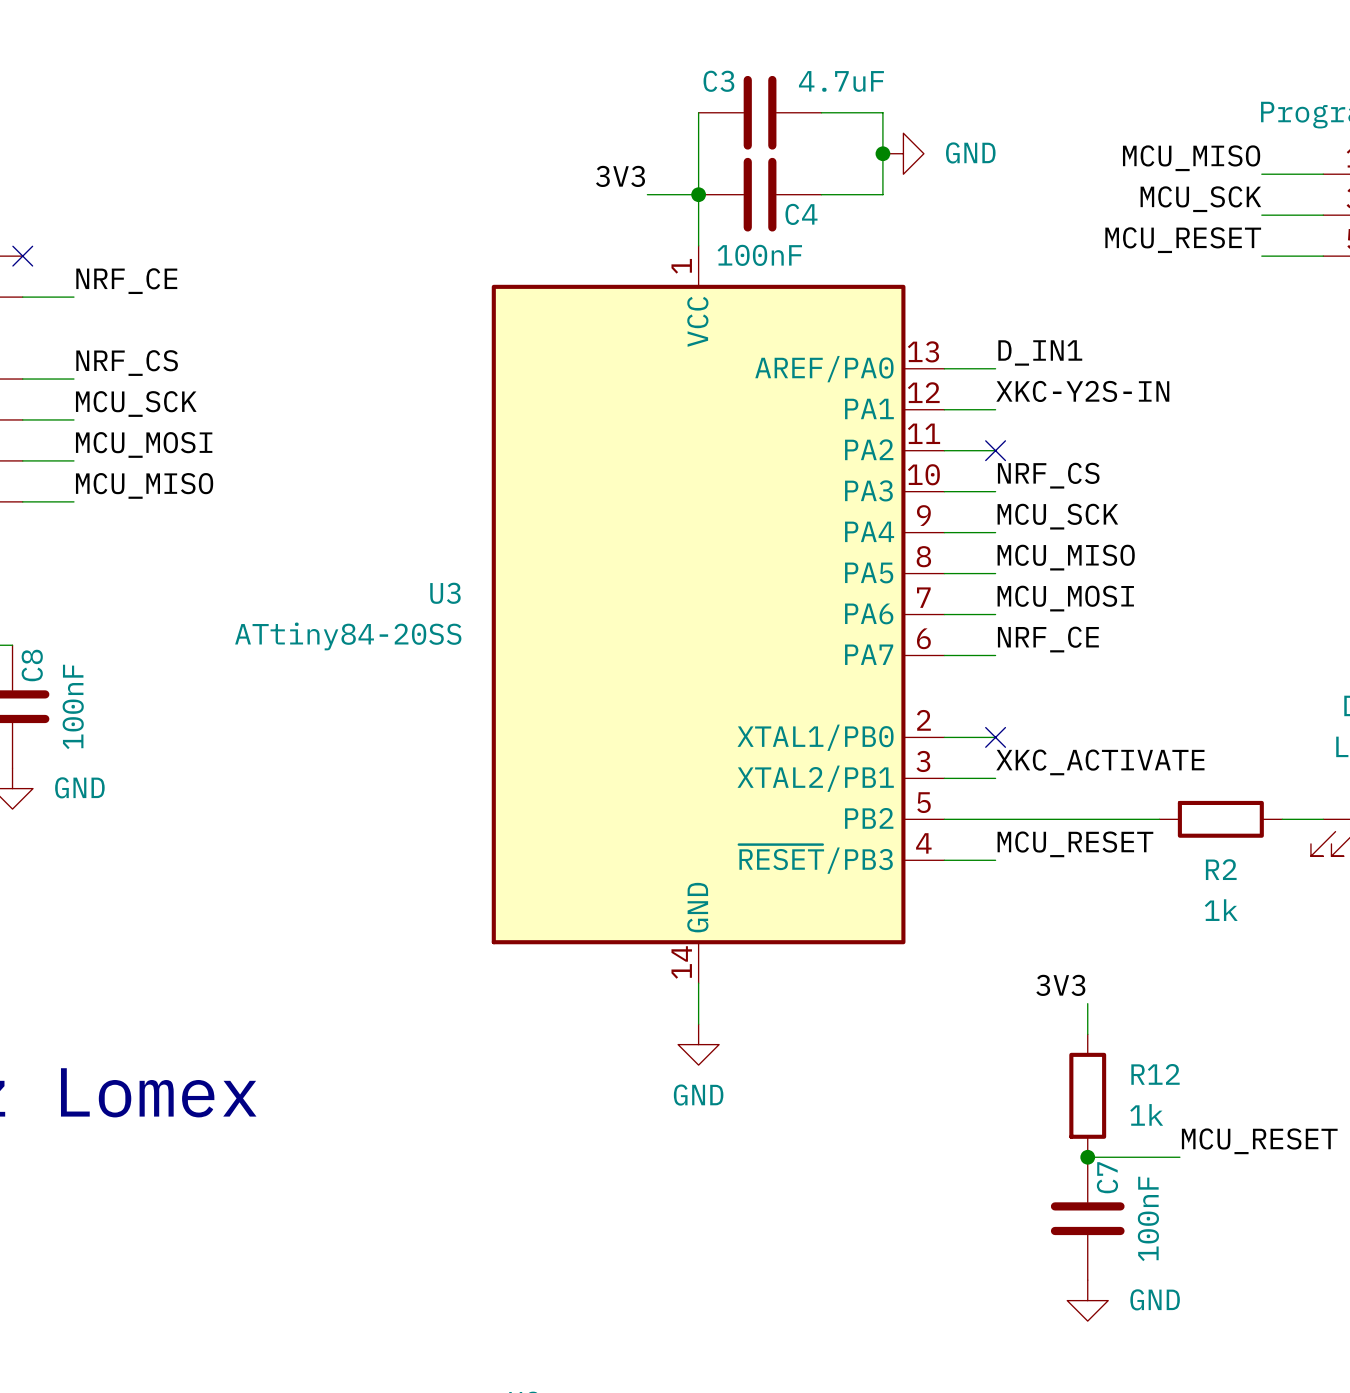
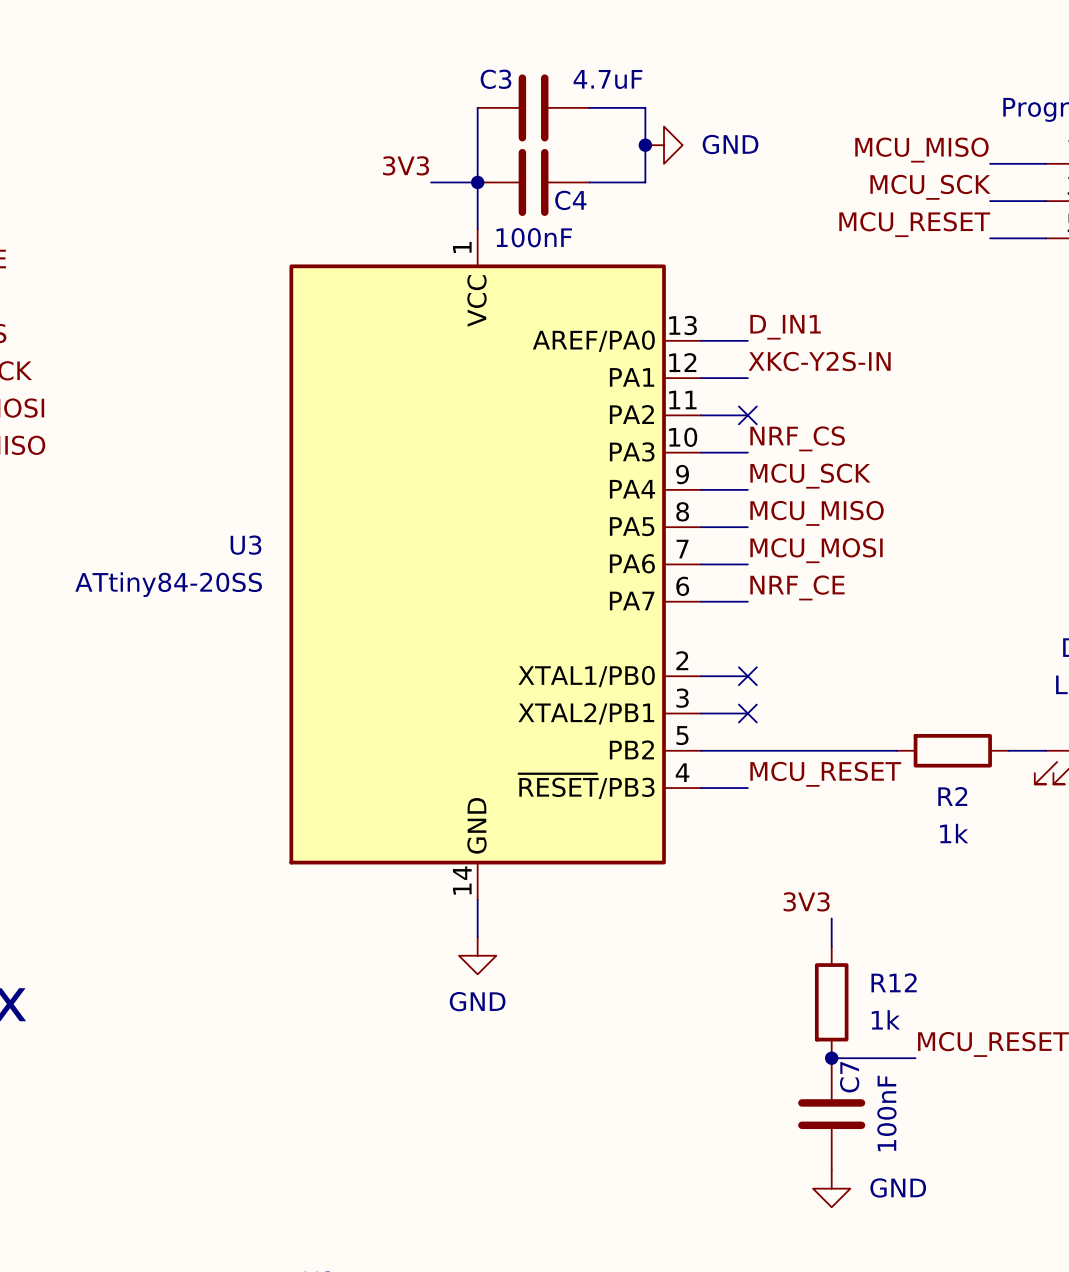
label: XKC_ACTIVATE (1100, 762) -> none
no-connect mark: none -> (747, 713)

